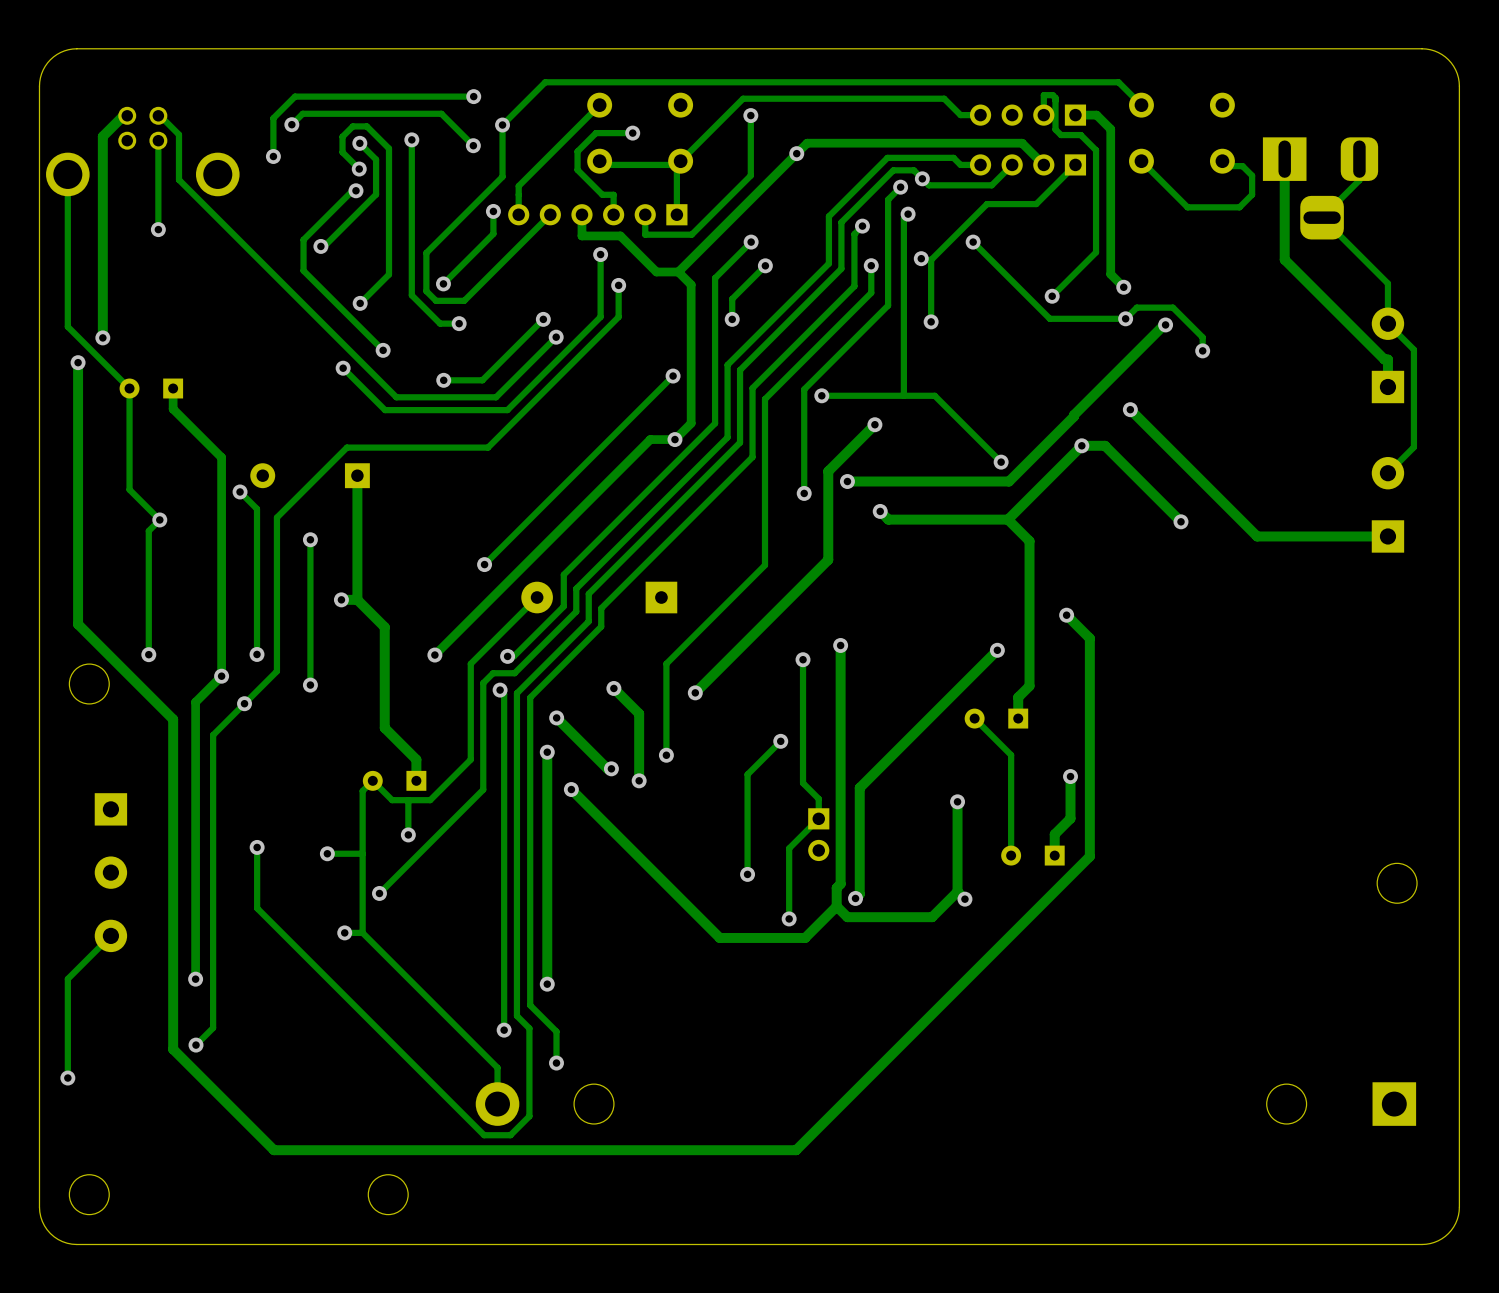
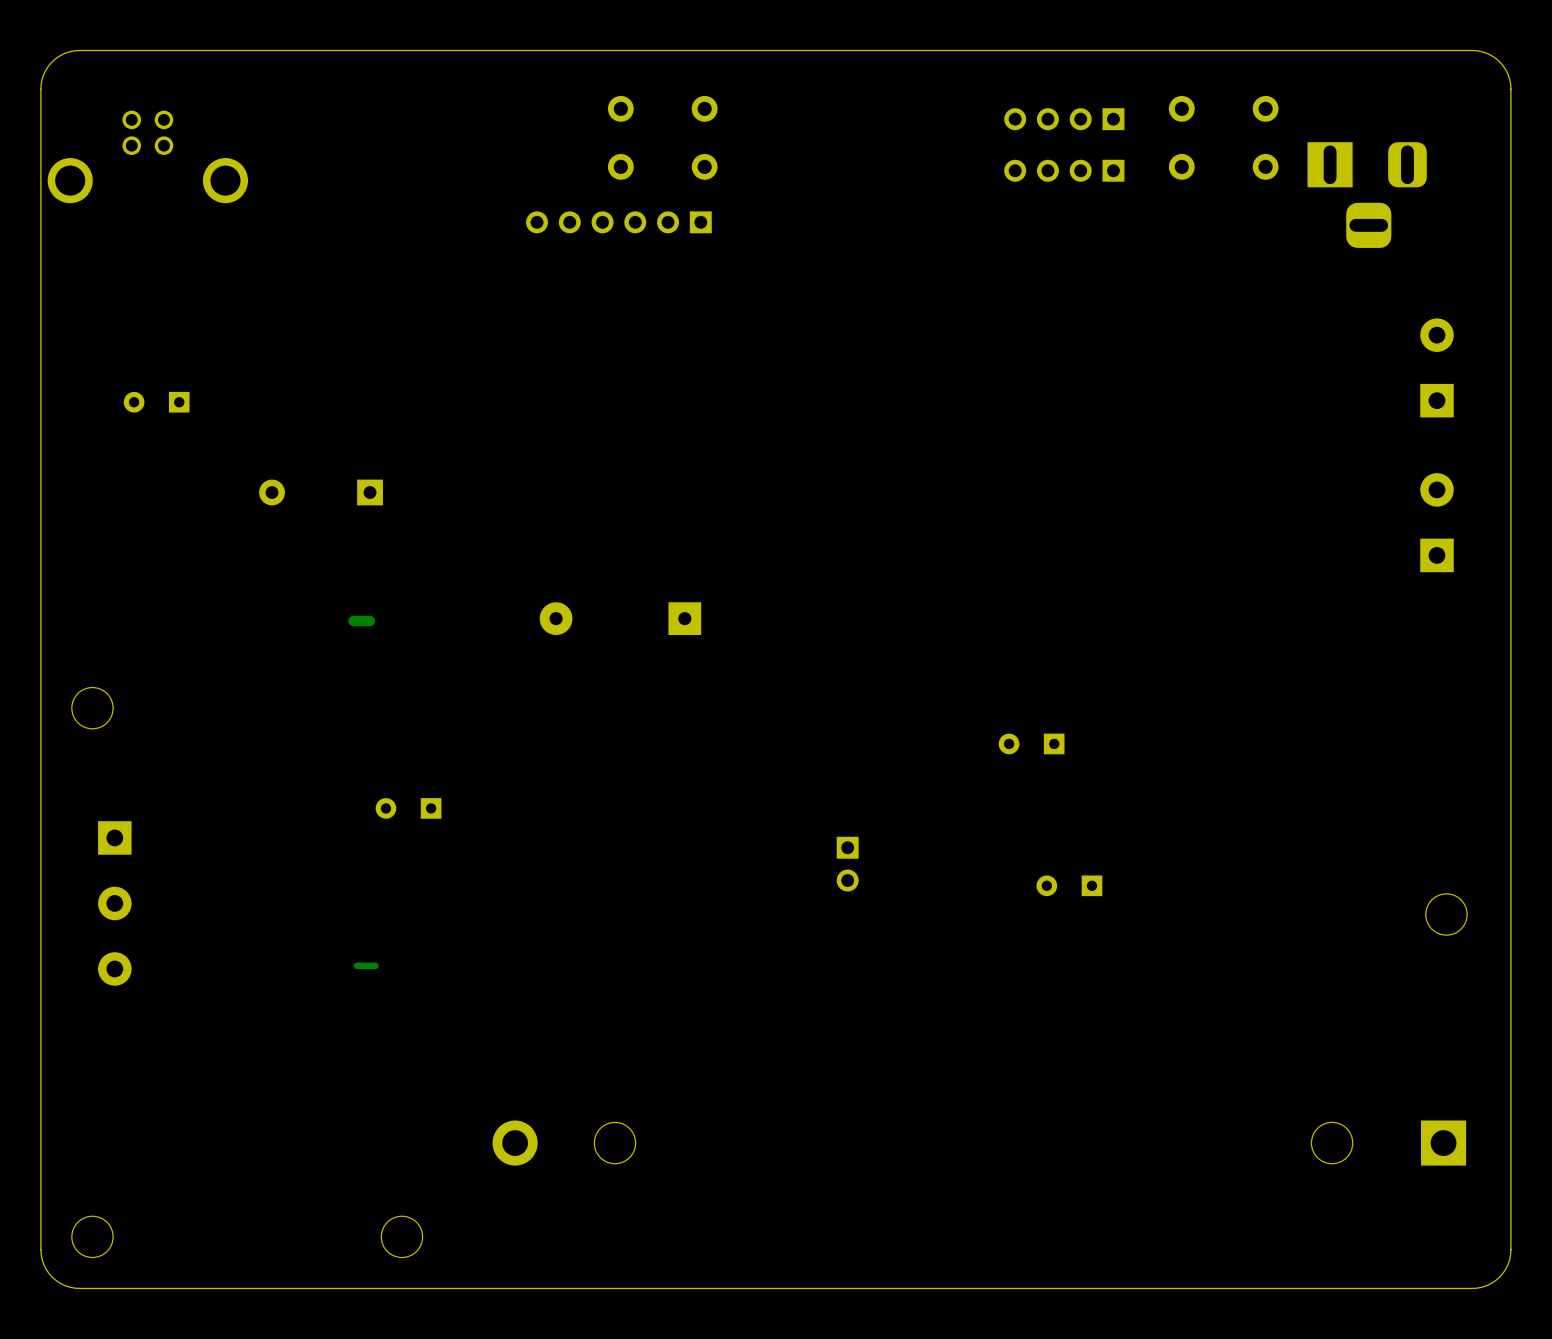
track: (473, 96) (295, 96) (273, 118) (273, 156) -> none
via: (473, 96) -> none
track: (1055, 100) (1052, 95) (1043, 95) (1043, 115) -> none
track: (1055, 100) (1055, 129) (1060, 135) (1080, 135) (1096, 150) (1096, 252) (1052, 296) -> none
track: (599, 105) (518, 186) (518, 214) -> none
track: (1141, 105) (1118, 82) (545, 82) (502, 125) (502, 176) (426, 252) (426, 291) (436, 300) (464, 300) (550, 214) -> none
track: (127, 115) (123, 115) (102, 136) (102, 337) -> none
track: (158, 115) (179, 134) (179, 179) (396, 397) (496, 397) (556, 337) -> none
track: (750, 115) (750, 175) (691, 234) (645, 234) (645, 214) -> none
via: (750, 115) -> none
track: (980, 115) (960, 115) (944, 98) (743, 98) (676, 164) -> none
track: (1075, 115) (1096, 115) (1110, 129) (1110, 274) (1123, 287) -> none
track: (291, 124) (302, 113) (441, 113) (473, 145) -> none
via: (291, 124) -> none
via: (502, 125) -> none
track: (632, 133) (595, 133) (577, 151) (577, 169) (602, 194) (613, 194) (613, 214) -> none
via: (632, 133) -> none
track: (411, 139) (411, 295) (440, 323) (459, 323) -> none
via: (411, 139) -> none
track: (158, 140) (158, 229) -> none
track: (359, 143) (376, 159) (376, 194) (324, 246) (320, 246) -> none
via: (359, 143) -> none
via: (473, 145) -> none
via: (796, 153) -> none
via: (273, 156) -> none
track: (1284, 159) (1284, 259) (1384, 359) (1387, 359) (1387, 387) -> none
track: (1359, 159) (1359, 180) (1322, 217) (1387, 283) (1387, 323) (1413, 349) (1413, 447) (1387, 473) -> none
track: (599, 161) (603, 164) (676, 164) -> none
track: (1222, 161) (1227, 166) (1242, 166) (1252, 175) (1252, 194) (1239, 207) (1187, 207) (1141, 161) -> none
track: (676, 164) (676, 214) -> none
track: (980, 164) (960, 164) (953, 157) (887, 157) (828, 216) (828, 263) (727, 364) (727, 437) (576, 588) (576, 611) (514, 673) (493, 673) (483, 683) (483, 789) (379, 893) -> none
track: (1012, 164) (991, 185) (928, 185) (913, 170) (893, 170) (841, 222) (841, 268) (740, 370) (740, 442) (588, 593) (588, 621) (516, 693) (516, 1015) (529, 1028) (529, 1116) (510, 1135) (484, 1135) (257, 908) (257, 847) -> none
track: (1043, 164) (1022, 143) (807, 143) (678, 272) -> none
track: (1075, 164) (1036, 204) (987, 204) (931, 259) -> none
track: (359, 169) (342, 152) (342, 136) (352, 126) (366, 126) (389, 148) (389, 274) (360, 303) -> none
via: (359, 169) -> none
track: (67, 174) (67, 326) (129, 388) (129, 489) (159, 519) (148, 530) (148, 654) -> none
via: (922, 178) -> none
track: (900, 187) (888, 199) (888, 305) (804, 389) (804, 493) -> none
via: (900, 187) -> none
track: (355, 190) (352, 190) (303, 239) (303, 270) (383, 350) -> none
via: (355, 190) -> none
track: (493, 211) (493, 233) (443, 283) -> none
via: (493, 211) -> none
track: (581, 214) (581, 235) (620, 235) (656, 272) (678, 272) -> none
track: (908, 214) (903, 218) (903, 395) -> none
via: (908, 214) -> none
track: (862, 226) (854, 234) (854, 286) (752, 388) (752, 457) (601, 608) (601, 626) (530, 697) (530, 1005) (556, 1031) (556, 1063) -> none
via: (862, 226) -> none
via: (158, 229) -> none
track: (751, 242) (715, 278) (715, 423) (563, 574) (563, 606) (513, 656) (507, 656) -> none
via: (751, 242) -> none
track: (973, 242) (1049, 318) (1125, 318) (1136, 307) (1172, 307) (1202, 337) (1202, 350) -> none
via: (973, 242) -> none
via: (320, 246) -> none
track: (600, 254) (600, 316) (507, 410) (385, 410) (343, 368) -> none
via: (600, 254) -> none
via: (921, 258) -> none
track: (931, 259) (931, 321) -> none
track: (765, 265) (732, 298) (732, 319) -> none
via: (765, 265) -> none
track: (871, 265) (871, 292) (765, 399) (765, 565) (666, 663) (666, 755) -> none
via: (871, 265) -> none
track: (678, 272) (691, 284) (691, 423) (674, 439) (650, 439) (434, 655) -> none
via: (443, 283) -> none
track: (618, 285) (618, 316) (488, 447) (346, 447) (276, 517) (276, 671) (213, 735) (213, 1027) (196, 1045) -> none
via: (618, 285) -> none
via: (1123, 287) -> none
via: (1052, 296) -> none
via: (360, 303) -> none
via: (1125, 318) -> none
track: (543, 319) (482, 380) (443, 380) -> none
via: (543, 319) -> none
via: (732, 319) -> none
via: (931, 321) -> none
via: (459, 323) -> none
track: (1165, 324) (1009, 481) (847, 481) -> none
via: (1165, 324) -> none
via: (102, 337) -> none
via: (556, 337) -> none
via: (383, 350) -> none
via: (1202, 350) -> none
track: (78, 362) (78, 624) (173, 719) (173, 1049) (274, 1150) (796, 1150) (1089, 856) (1089, 638) (1066, 615) -> none
via: (78, 362) -> none
via: (343, 368) -> none
track: (673, 376) (484, 564) -> none
via: (673, 376) -> none
via: (443, 380) -> none
track: (173, 388) (173, 409) (221, 457) (221, 676) (195, 702) (195, 979) -> none
track: (821, 395) (934, 395) (1001, 462) -> none
via: (821, 395) -> none
track: (1130, 409) (1257, 536) (1387, 536) -> none
via: (1130, 409) -> none
track: (874, 424) (828, 471) (828, 559) (695, 692) -> none
via: (874, 424) -> none
via: (674, 439) -> none
via: (1081, 445) -> none
via: (1001, 462) -> none
track: (357, 475) (357, 599) (384, 627) (384, 728) (416, 759) (416, 780) -> none
via: (847, 481) -> none
track: (240, 491) (257, 508) (257, 654) -> none
via: (240, 491) -> none
via: (804, 493) -> none
track: (880, 511) (888, 519) (1007, 519) -> none
via: (880, 511) -> none
via: (159, 519) -> none
track: (1007, 519) (1029, 541) (1029, 686) (1018, 697) (1018, 718) -> none
track: (1007, 519) (1081, 445) (1104, 445) (1181, 521) -> none
via: (1181, 521) -> none
track: (310, 539) (310, 685) -> none
via: (310, 539) -> none
via: (484, 564) -> none
track: (537, 597) (470, 663) (470, 759) (430, 800) (392, 800) (372, 780) (362, 790) (362, 932) (497, 1067) (497, 1104) -> none
via: (341, 599) -> none
via: (1066, 615) -> none
track: (840, 645) (840, 884) (836, 887) (836, 906) -> none
via: (840, 645) -> none
track: (997, 650) (859, 787) (859, 894) (855, 898) -> none
via: (997, 650) -> none
via: (148, 654) -> none
via: (257, 654) -> none
via: (434, 655) -> none
via: (507, 656) -> none
track: (803, 659) (803, 783) (818, 798) (818, 818) (789, 848) (789, 918) -> none
via: (803, 659) -> none
via: (221, 676) -> none
via: (310, 685) -> none
track: (613, 688) (639, 713) (639, 780) -> none
via: (613, 688) -> none
track: (500, 690) (504, 694) (504, 1030) -> none
via: (500, 690) -> none
via: (695, 692) -> none
via: (244, 703) -> none
track: (556, 717) (607, 768) (611, 768) -> none
via: (556, 717) -> none
track: (974, 718) (1011, 755) (1011, 855) -> none
track: (780, 741) (747, 774) (747, 874) -> none
via: (780, 741) -> none
track: (547, 752) (547, 984) -> none
via: (547, 752) -> none
via: (666, 755) -> none
via: (611, 768) -> none
track: (1070, 776) (1070, 818) (1054, 834) (1054, 855) -> none
via: (1070, 776) -> none
via: (639, 780) -> none
track: (571, 789) (719, 937) (805, 937) (836, 906) -> none
via: (571, 789) -> none
track: (408, 800) (408, 834) -> none
track: (957, 801) (957, 891) -> none
via: (957, 801) -> none
via: (408, 834) -> none
via: (257, 847) -> none
via: (327, 853) -> none
track: (362, 853) (327, 853) -> none
via: (747, 874) -> none
track: (957, 891) (932, 917) (847, 917) (836, 906) -> none
via: (379, 893) -> none
via: (855, 898) -> none
via: (964, 899) -> none
via: (789, 918) -> none
via: (344, 932) -> none
track: (110, 935) (67, 978) (67, 1078) -> none
via: (195, 979) -> none
via: (547, 984) -> none
via: (504, 1030) -> none
via: (196, 1045) -> none
via: (556, 1063) -> none
via: (67, 1078) -> none

